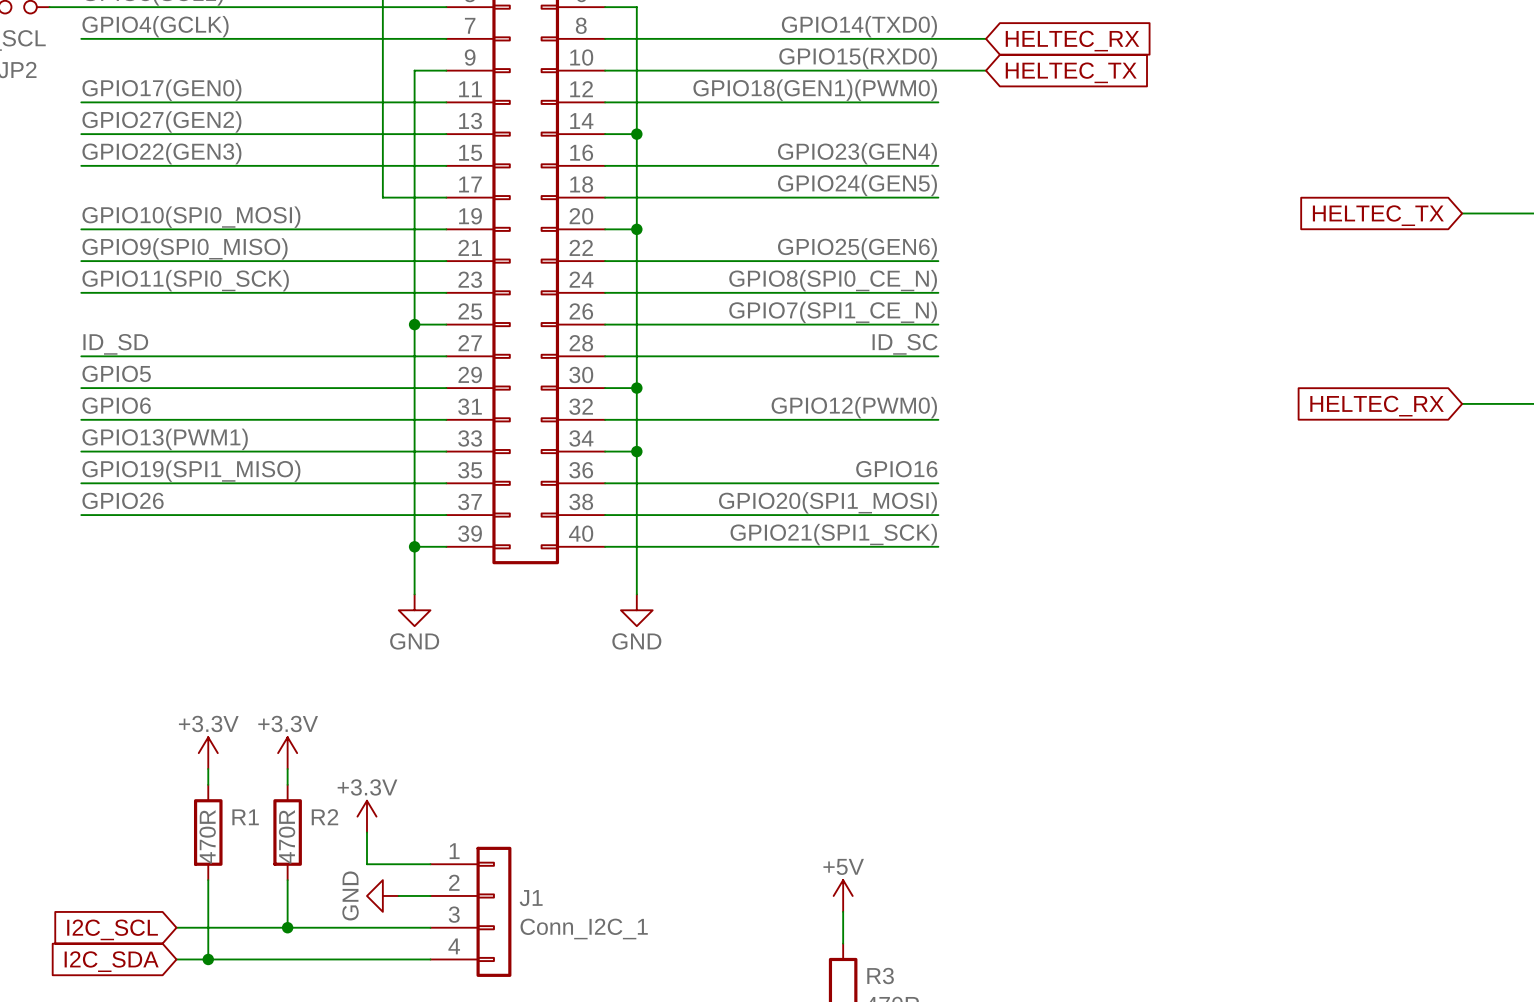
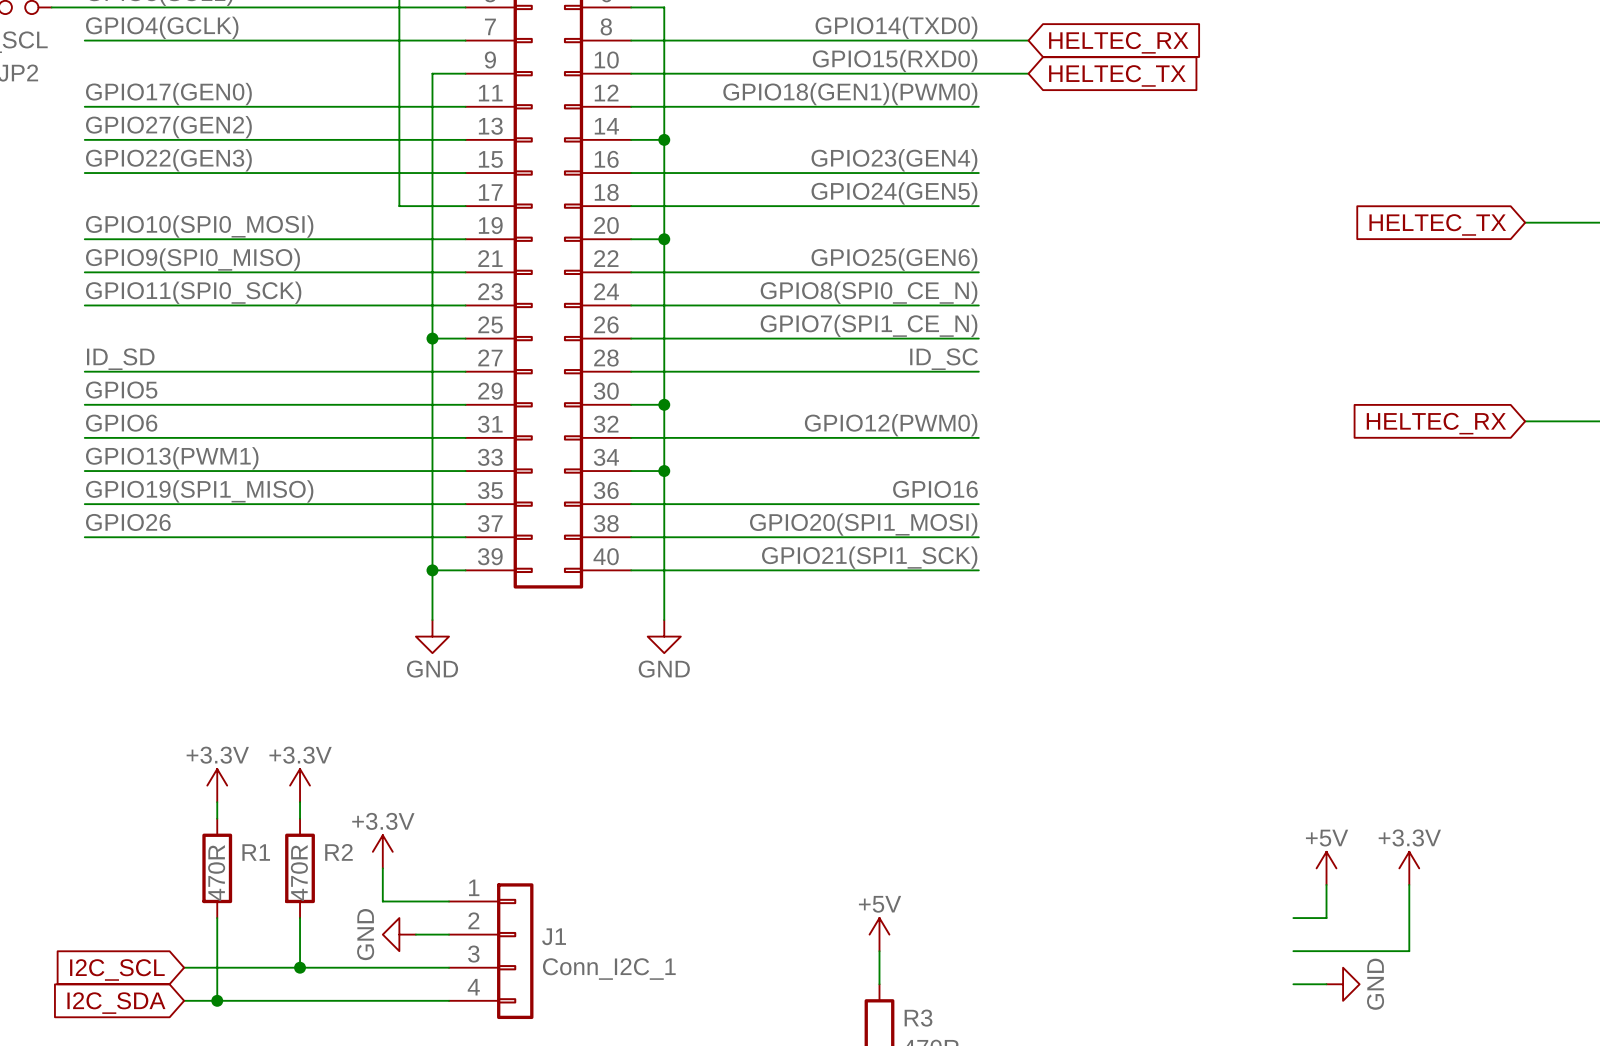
power symbol: none -> +5V (1326, 868)
power symbol: none -> +3.3V (1409, 868)
wire: none -> (1326, 884) (1326, 918) (1293, 918)
wire: none -> (1409, 884) (1409, 951) (1293, 951)
wire: none -> (1293, 984) (1326, 984)
power symbol: none -> GND (1343, 984)

